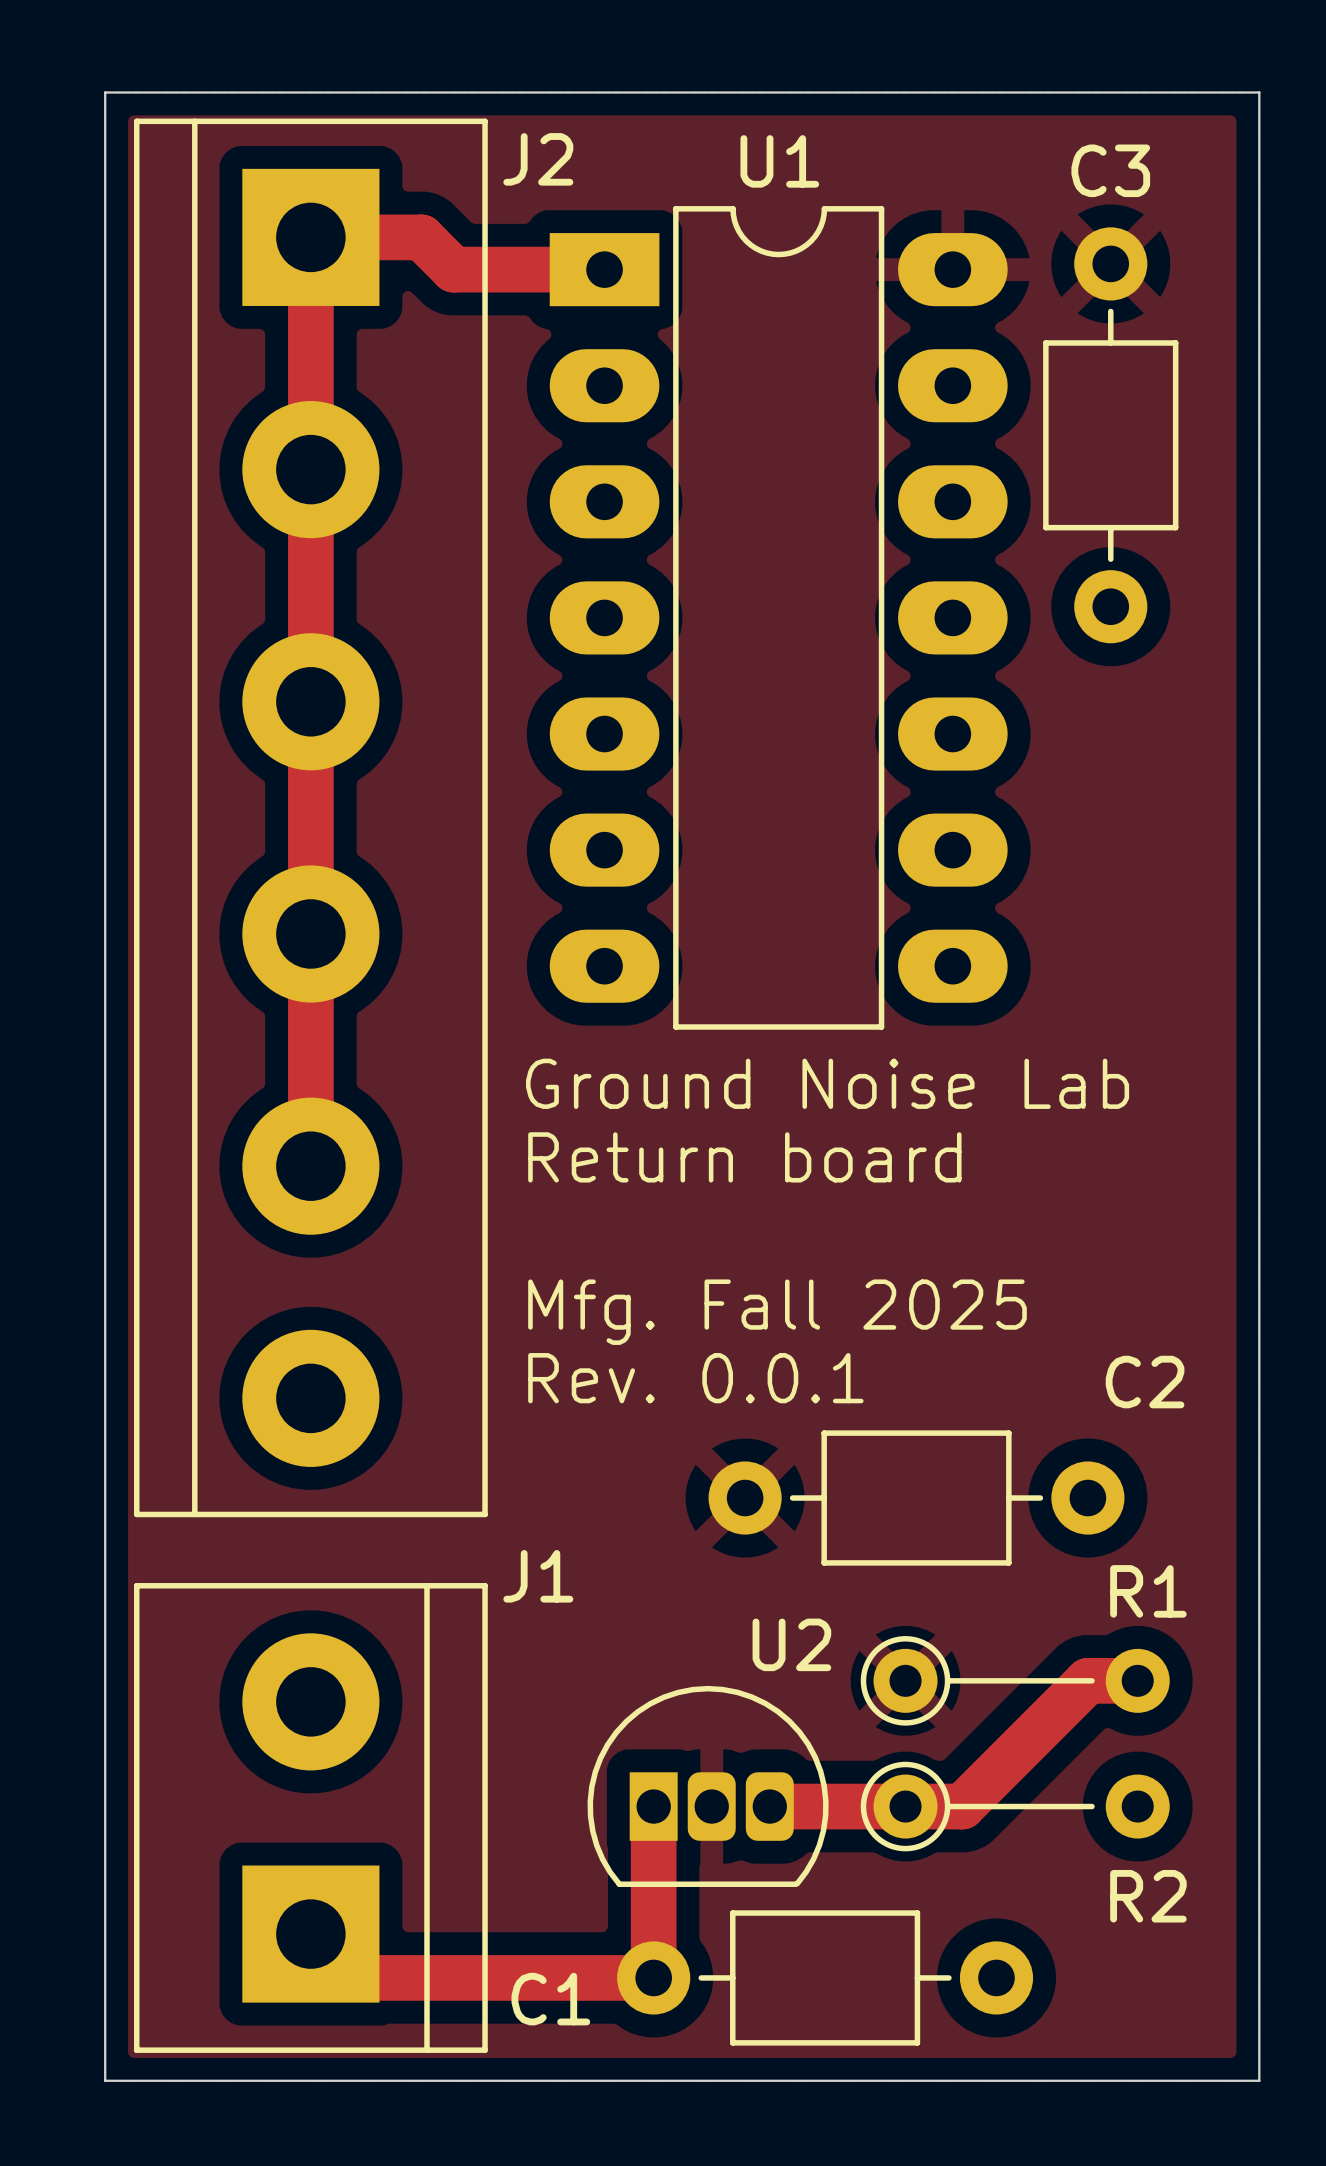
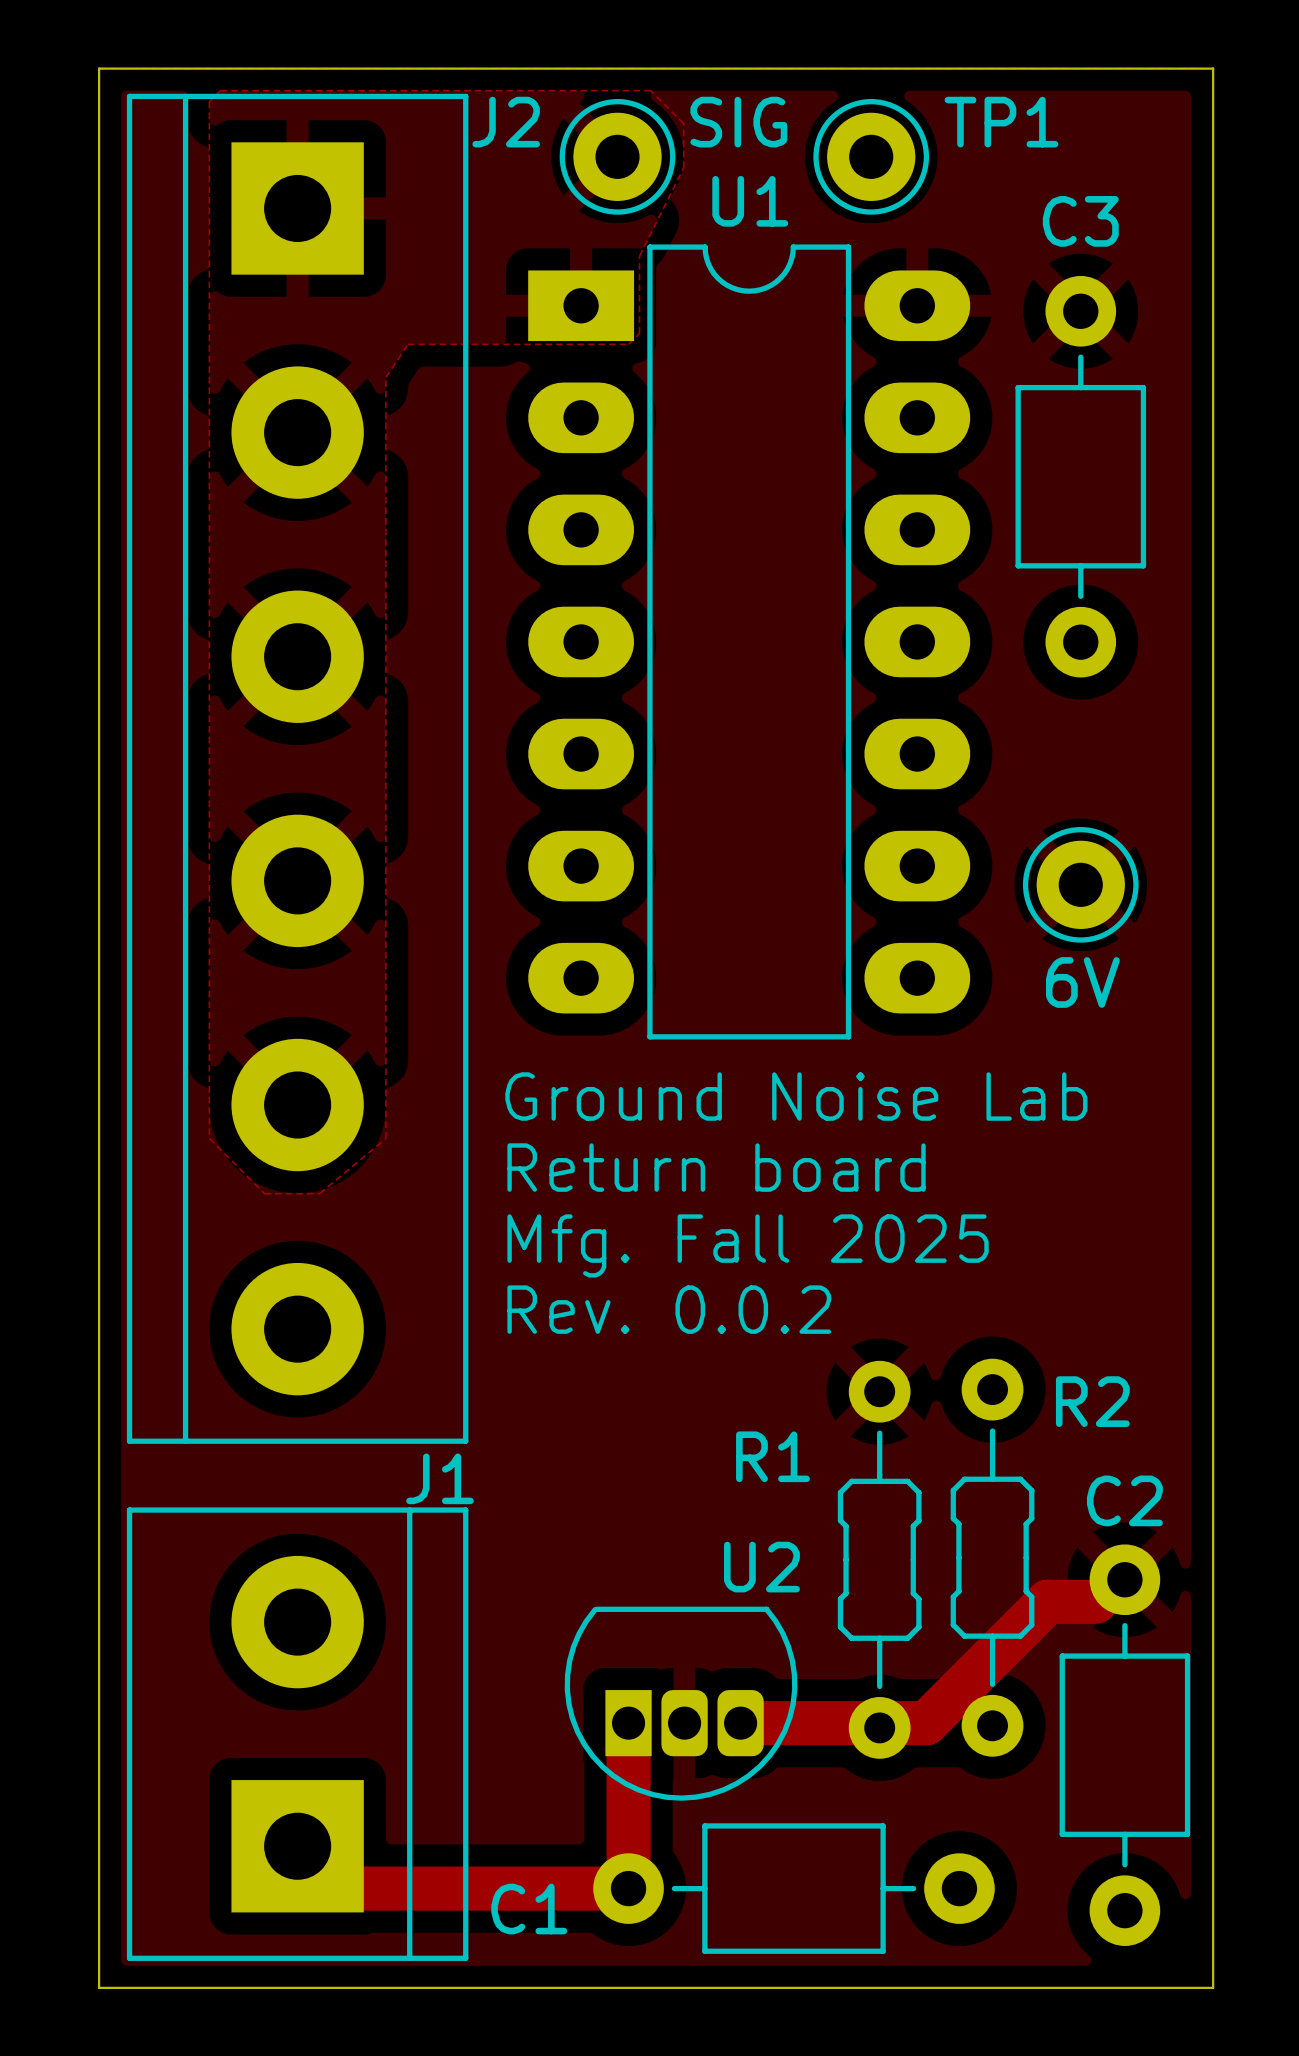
zone outline: none -> (220, 90) (650, 90) (683, 123) (683, 167) (639, 256) (639, 333) (628, 344) (407, 344) (385, 377) (385, 1138) (319, 1193) (264, 1193) (209, 1138) (209, 101) (220, 90)
J2 name position: J2 (538, 159) -> J2 (506, 122)
SIG: none -> (617, 156)
TP1: none -> (871, 156)
track: (604, 269) (453, 269) (421, 237) (310, 237) (310, 1166) -> none
C3 position: (1110, 435) -> (1080, 476)
U1 position: (778, 617) -> (749, 641)
6V: none -> (1080, 884)
text: Ground Noise Lab (827, 1083) -> none
text: Return board (744, 1157) -> Ground Noise Lab (796, 1096)
text: none -> Return board (716, 1167)
text: Rev. 0.0.1 (695, 1378) -> Rev. 0.0.2 (669, 1309)
C2 name position: C2 (1145, 1382) -> C2 (1124, 1500)
C2 rotation: 0° (916, 1498) -> 90° clockwise (1124, 1745)
C2 position: (916, 1498) -> (1124, 1745)
J1 name position: J1 (538, 1576) -> J1 (439, 1478)
R1 name position: R1 (1148, 1591) -> R1 (772, 1456)
R1 footprint: [860, 1636, 1170, 1726] -> [837, 1360, 922, 1759]
U2 footprint: [587, 1685, 829, 1887] -> [564, 1606, 798, 1801]
R2 footprint: [860, 1761, 1170, 1852] -> [950, 1358, 1035, 1757]
R2 name position: R2 (1148, 1896) -> R2 (1092, 1401)

